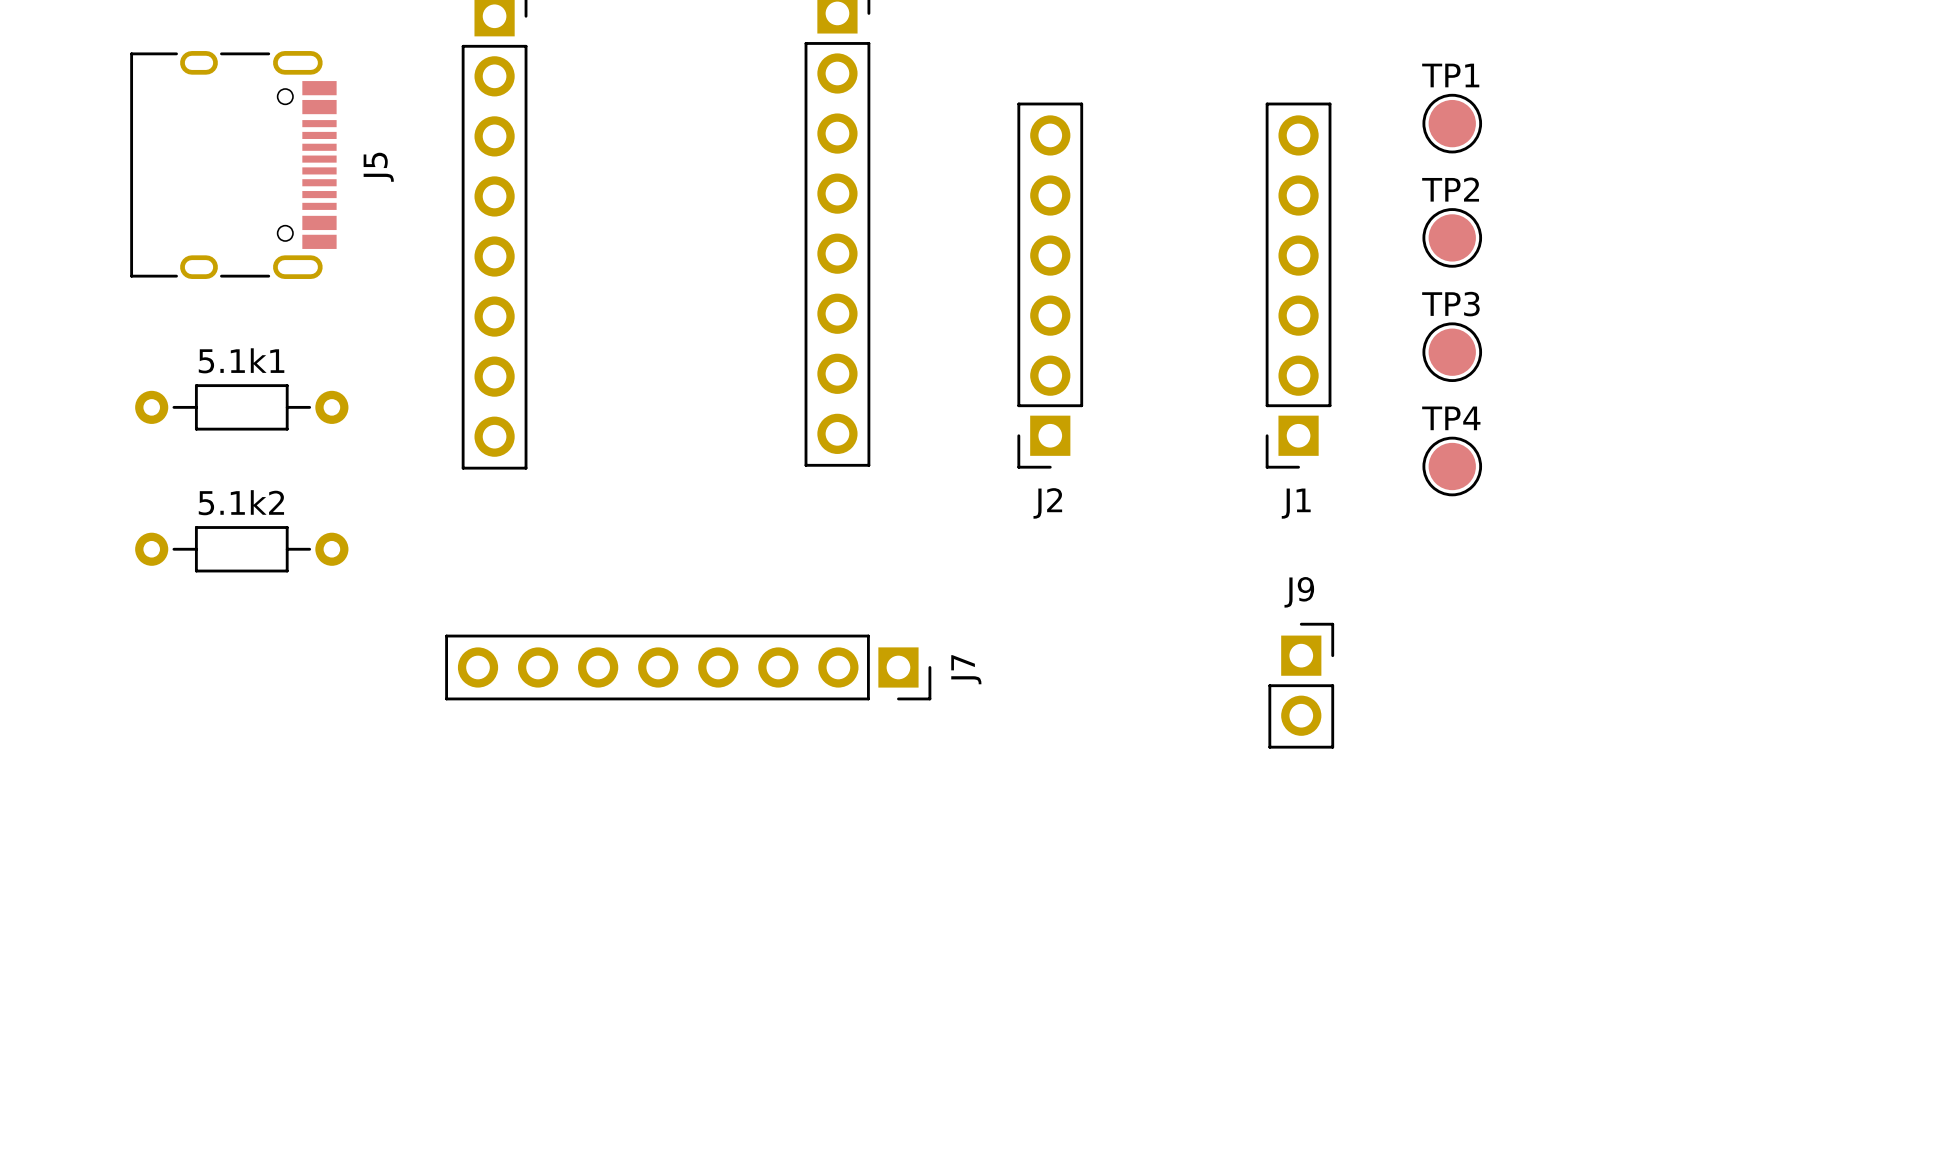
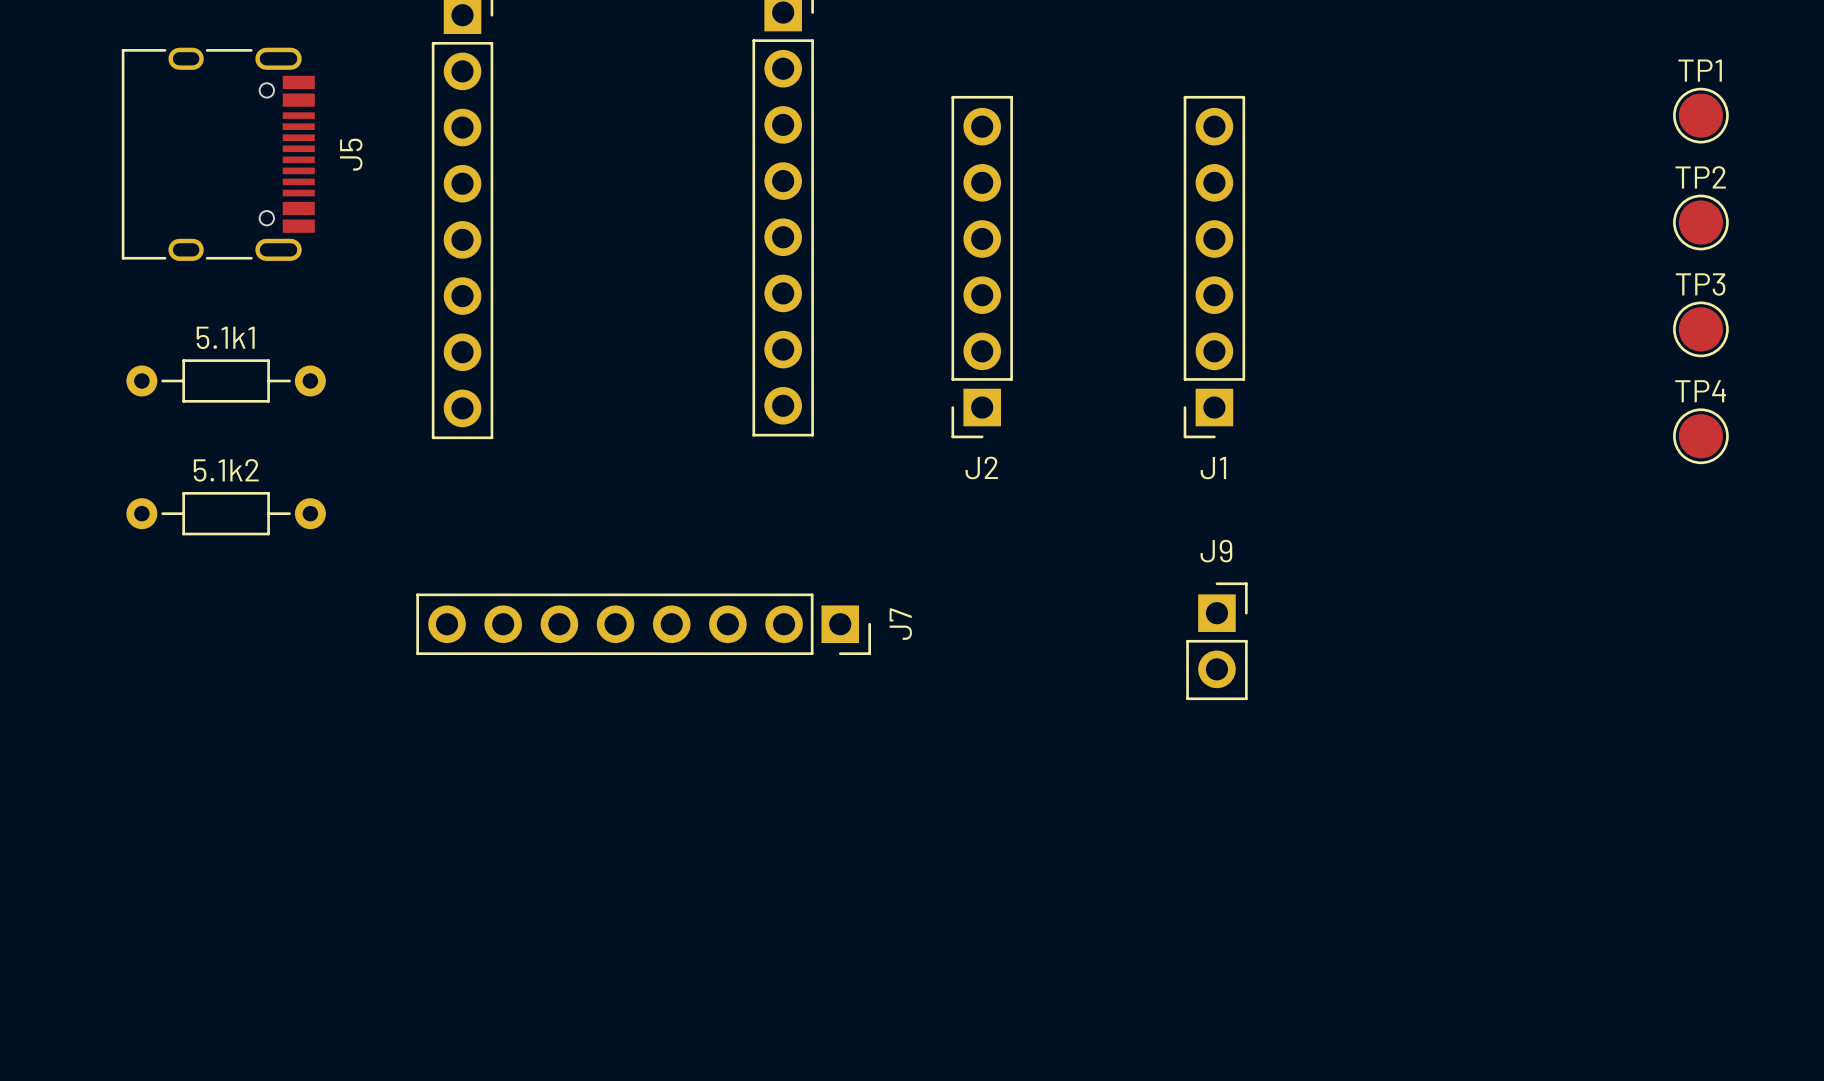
TP1 position: (1452, 123) -> (1700, 115)
TP2 position: (1452, 237) -> (1700, 222)
TP3 position: (1452, 352) -> (1700, 329)
TP4 position: (1452, 466) -> (1700, 436)

